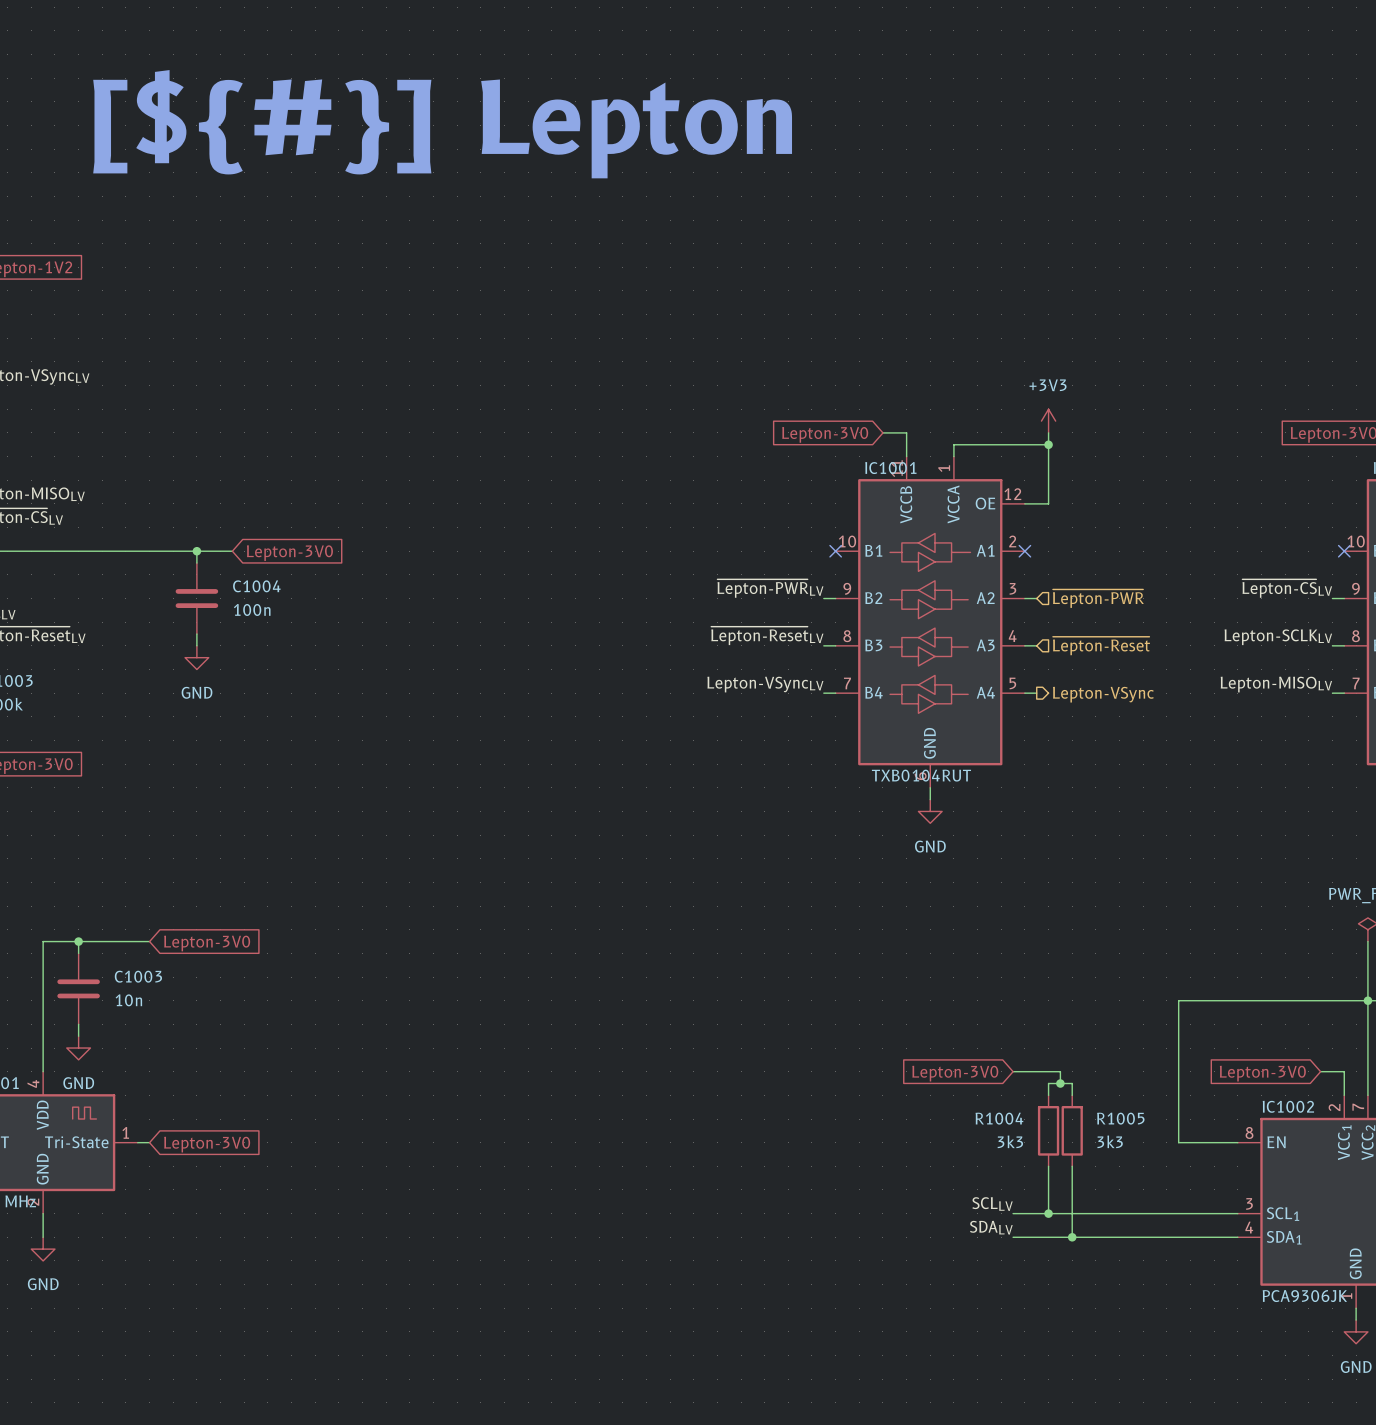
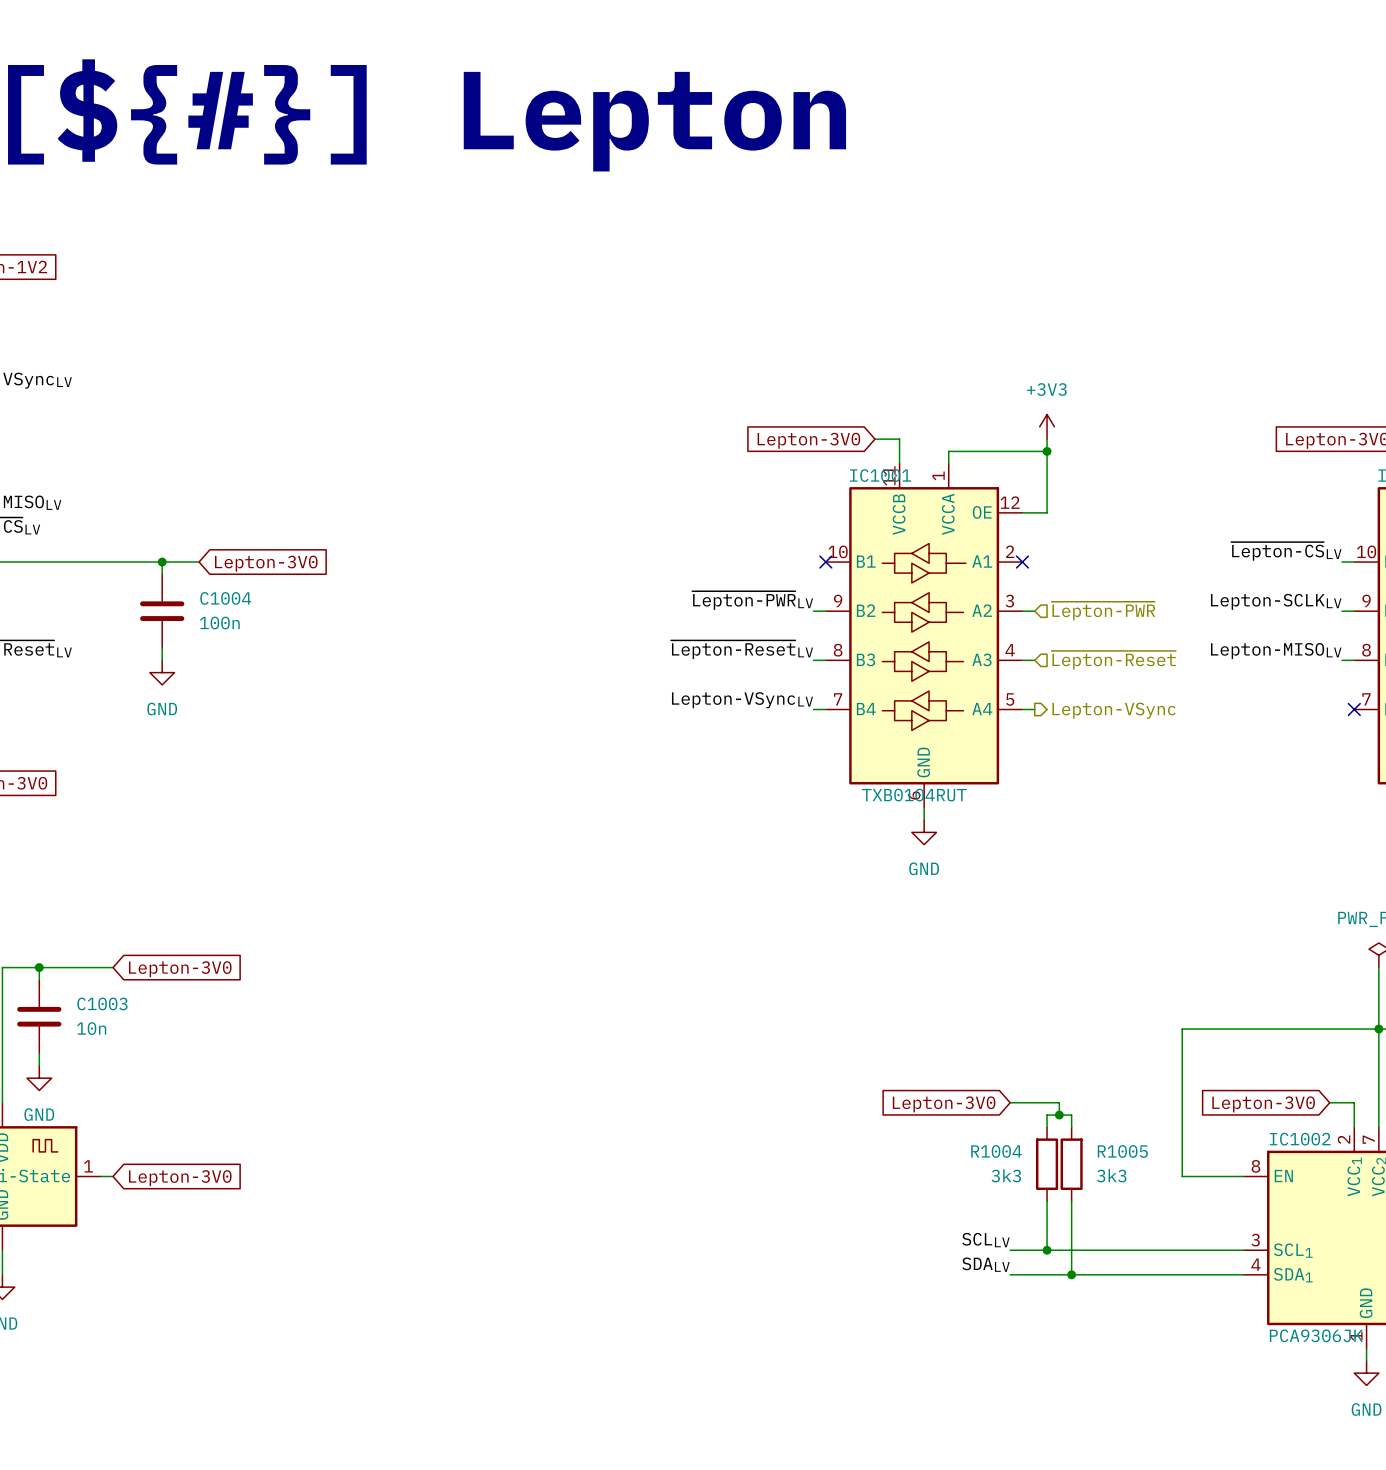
label: none -> ~{Lepton-CS}LV (1286, 551)
no-connect mark: (1344, 551) -> none
label: ~{Lepton-CS}LV (1287, 588) -> Lepton-SCLKLV (1276, 601)
label: Lepton-SCLKLV (1278, 637) -> Lepton-MISOLV (1276, 651)
label: Lepton-MISOLV (1276, 684) -> none
wire: (1332, 693) (1344, 693) -> (1341, 562) (1354, 562)
no-connect mark: none -> (1354, 709)

